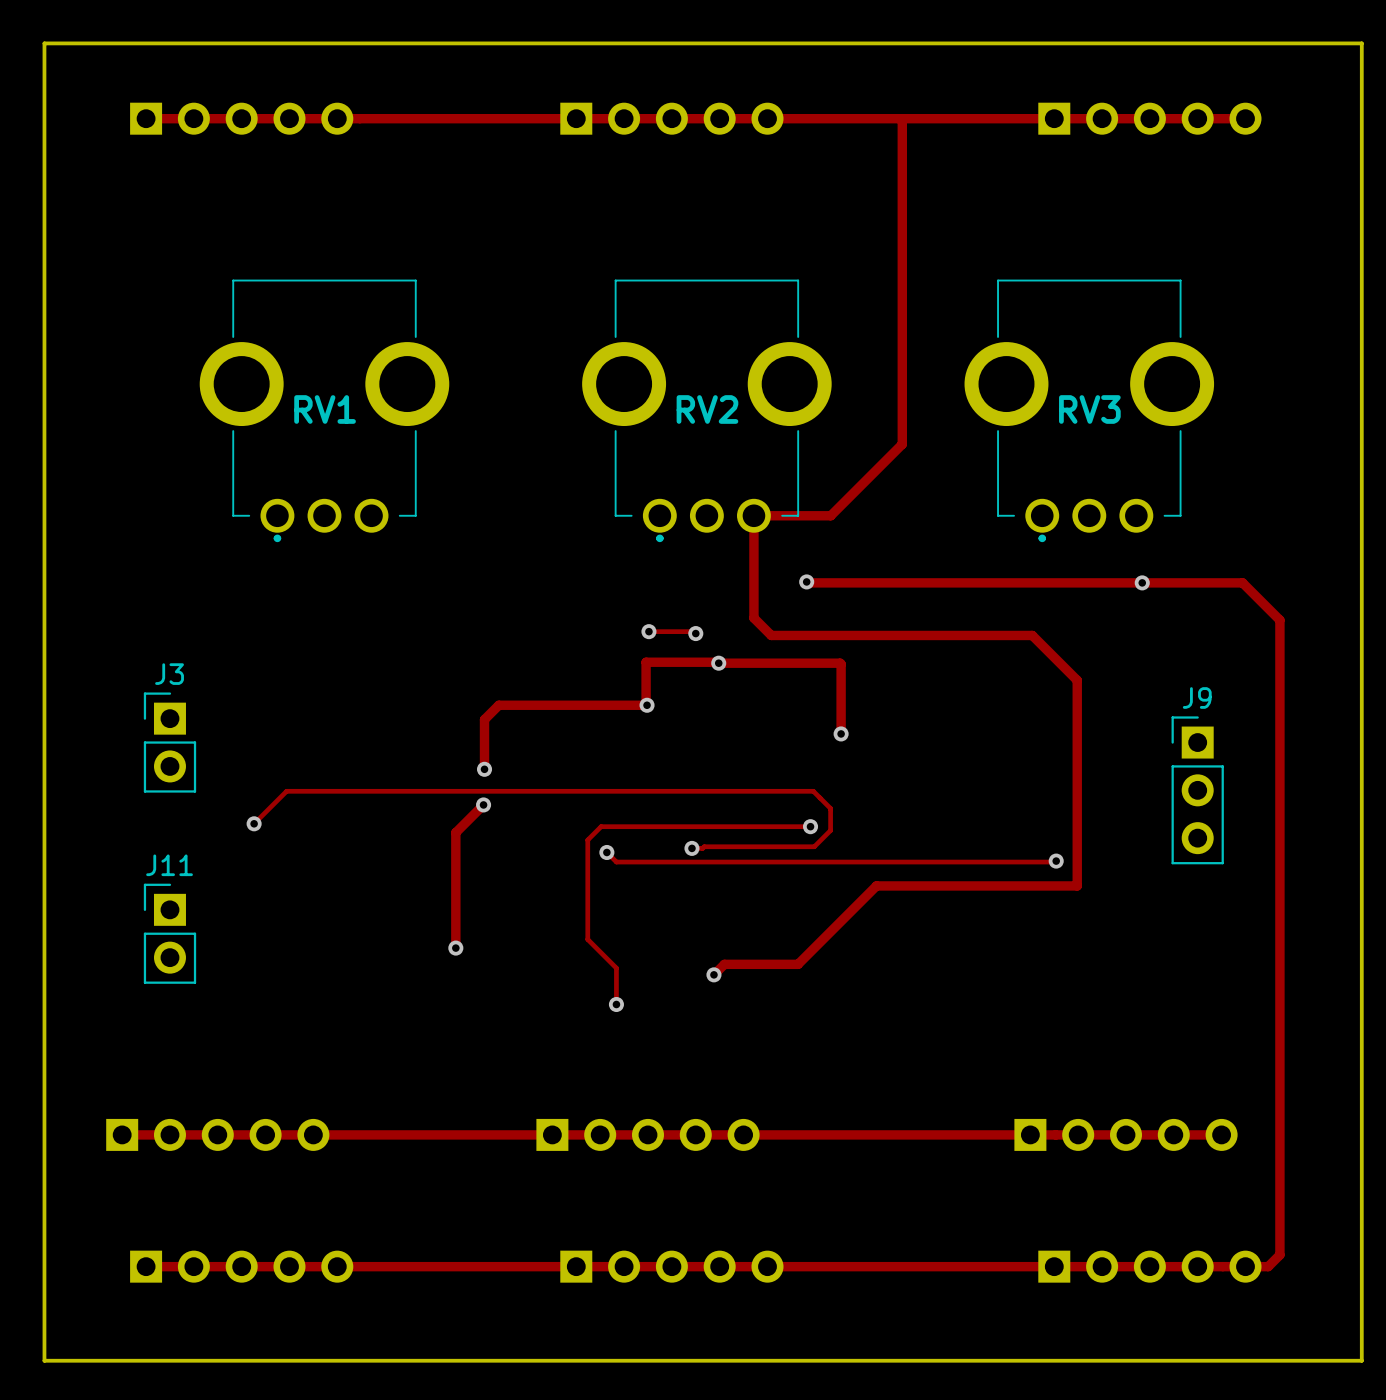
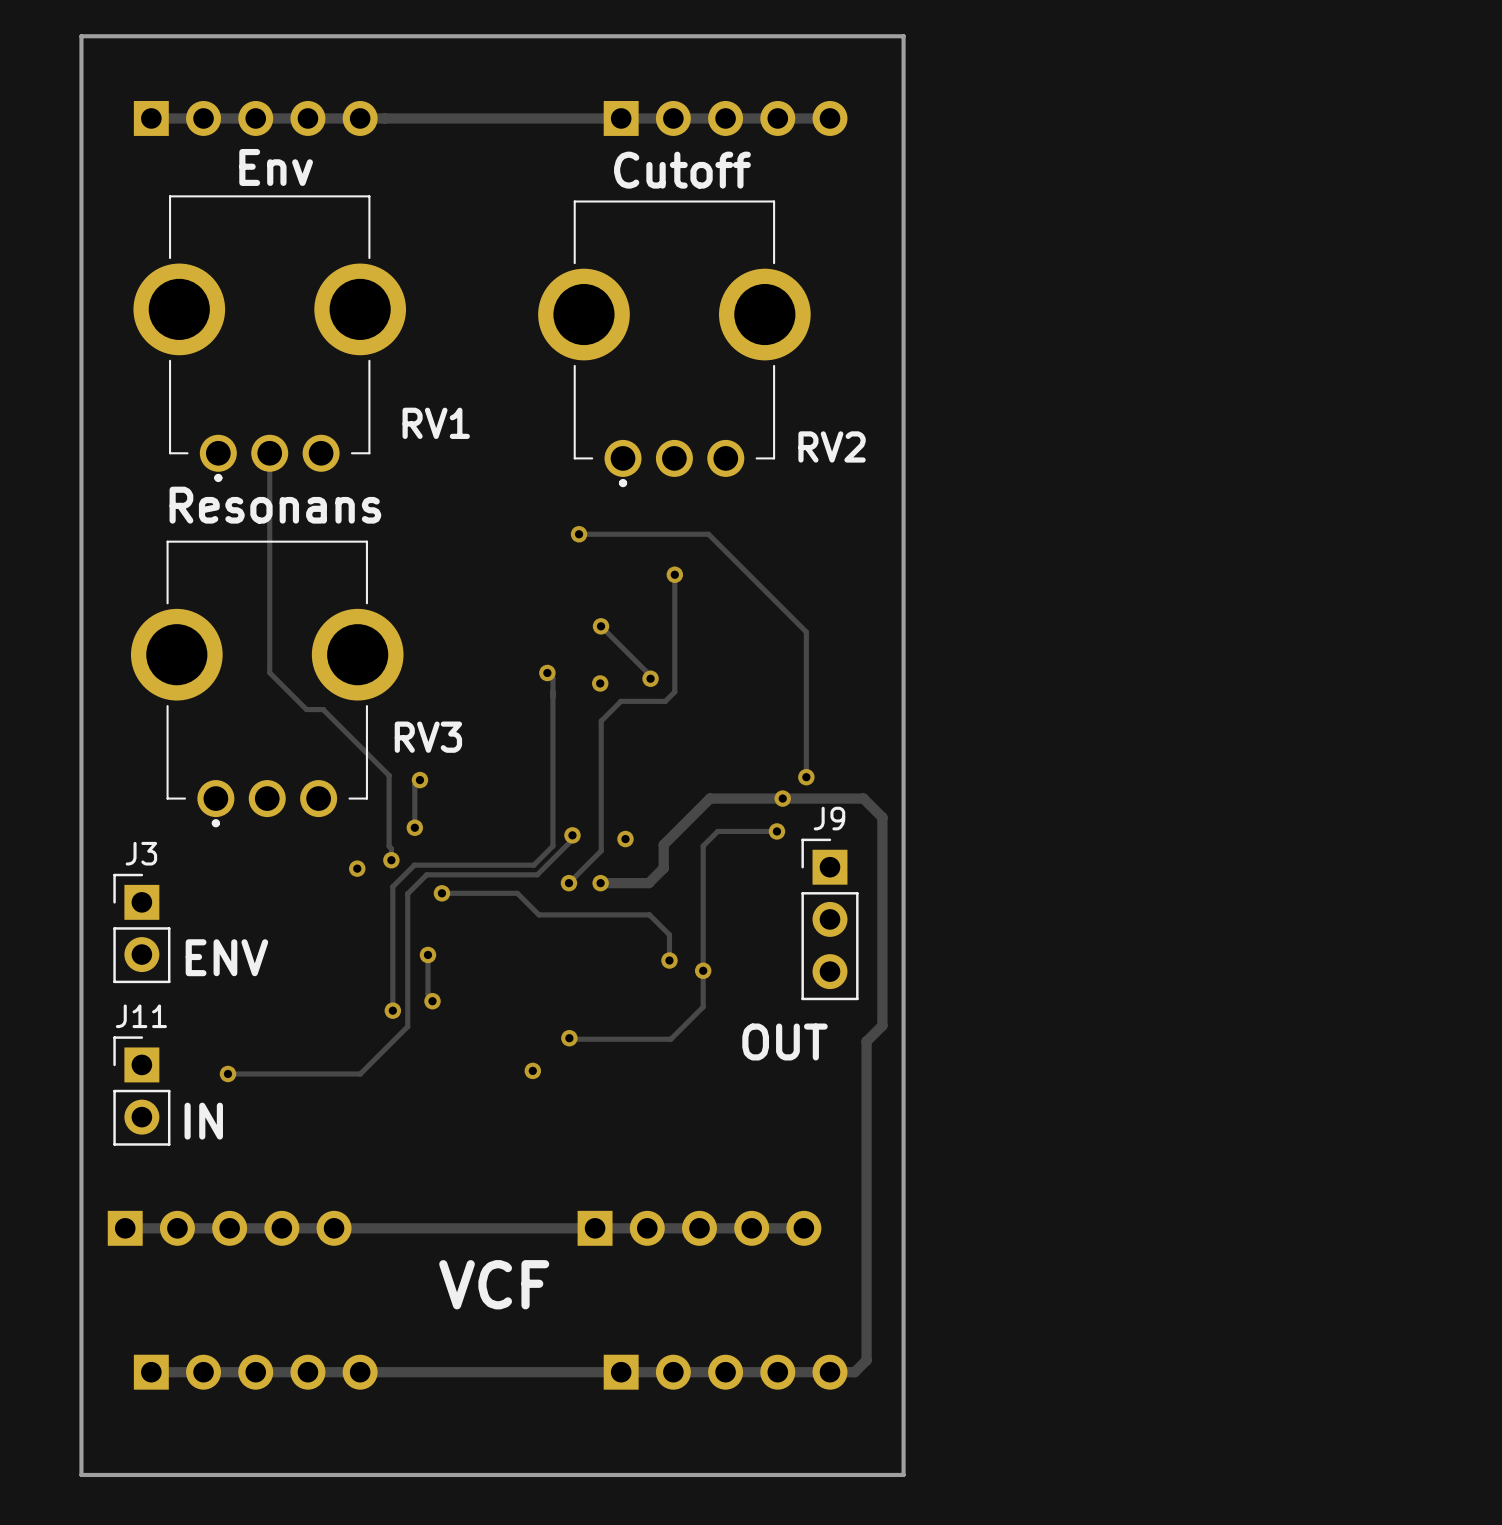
board edge: (82, 43) (44, 43) (44, 1360) (82, 1360) -> (81, 36) (81, 1474)
board edge: (834, 43) (1361, 43) (1361, 1360) (834, 1360) -> (903, 36) (903, 1474)
track: (767, 118) (1245, 118) -> none
track: (902, 118) (902, 444) (830, 515) (753, 515) (753, 618) (771, 635) (1032, 635) (1077, 680) (1077, 885) (876, 885) (798, 964) (724, 964) (713, 974) -> none
part: (1149, 118) -> none
text: none -> Env (276, 167)
text: none -> Cutoff (682, 170)
RV1 name position: RV1 (325, 409) -> RV1 (436, 423)
RV2 name position: RV2 (707, 409) -> RV2 (832, 446)
RV3 name position: RV3 (1089, 409) -> RV3 (428, 737)
RV1 position: (324, 410) -> (269, 338)
RV2 position: (706, 410) -> (674, 343)
RV3 position: (1089, 410) -> (267, 683)
track: none -> (269, 453) (269, 672) (306, 709) (323, 709) (389, 775) (389, 846) (391, 848) (391, 860)
text: none -> Resonans (275, 505)
track: none -> (579, 534) (708, 534) (806, 632) (806, 777)
via: none -> (579, 534)
track: none -> (674, 574) (674, 691) (665, 701) (620, 701) (601, 721) (601, 850) (568, 883)
via: none -> (674, 574)
track: (806, 581) (1242, 582) (1279, 620) (1279, 1254) (1268, 1266) (790, 1266) -> (600, 883) (648, 883) (663, 868) (663, 844) (709, 798) (863, 798) (882, 817) (882, 1025) (866, 1041) (866, 1360) (854, 1372)
via: (806, 581) -> none
via: (1142, 582) -> none
track: none -> (601, 626) (650, 675) (650, 678)
via: none -> (601, 626)
track: none -> (547, 672) (552, 678) (552, 846) (533, 865) (414, 865) (392, 886) (392, 1010)
via: none -> (547, 672)
via: none -> (650, 678)
track: (648, 631) (693, 631) (695, 633) -> none
via: (648, 631) -> none
via: (695, 633) -> none
via: none -> (600, 683)
via: (718, 663) -> none
via: (647, 705) -> none
via: none -> (806, 777)
track: none -> (419, 780) (414, 785) (414, 827)
via: none -> (419, 780)
track: (841, 733) (840, 663) (646, 662) (647, 705) (498, 705) (484, 719) (484, 769) -> none
via: (841, 733) -> none
via: none -> (782, 798)
J3 position: (169, 742) -> (141, 928)
via: none -> (414, 827)
via: (484, 769) -> none
track: none -> (776, 831) (717, 831) (703, 846) (703, 1006) (670, 1039) (569, 1038)
via: none -> (776, 831)
track: none -> (572, 835) (572, 839) (537, 874) (426, 874) (407, 893) (407, 1026) (360, 1073) (228, 1073)
via: none -> (572, 835)
via: none -> (625, 839)
J9 position: (1197, 790) -> (829, 919)
via: none -> (391, 860)
track: (483, 804) (455, 832) (455, 948) -> none
via: (483, 804) -> none
via: none -> (357, 868)
via: none -> (568, 883)
via: none -> (600, 883)
track: (254, 823) (286, 791) (813, 791) (830, 808) (830, 830) (814, 846) (691, 848) -> none
via: (254, 823) -> none
track: (810, 826) (601, 826) (587, 840) (587, 939) (616, 968) (616, 1004) -> none
via: (810, 826) -> none
track: none -> (441, 893) (517, 893) (538, 914) (649, 914) (654, 919)
via: none -> (441, 893)
via: (691, 848) -> none
via: (606, 852) -> none
track: (1056, 861) (616, 862) -> (669, 960) (669, 934) (665, 930)
via: (1056, 861) -> none
track: none -> (427, 954) (427, 994) (432, 1001)
via: none -> (427, 954)
text: none -> ENV (226, 957)
via: none -> (669, 960)
via: none -> (703, 970)
via: none -> (432, 1001)
J11 position: (169, 933) -> (141, 1091)
via: none -> (392, 1010)
via: (455, 948) -> none
via: none -> (569, 1038)
text: none -> OUT (785, 1041)
via: (713, 974) -> none
via: none -> (532, 1070)
via: none -> (228, 1073)
via: (616, 1004) -> none
text: none -> IN (203, 1121)
track: (743, 1134) (1221, 1134) -> none
part: (1126, 1134) -> none
text: none -> VCF (494, 1284)
part: (1149, 1266) -> none

